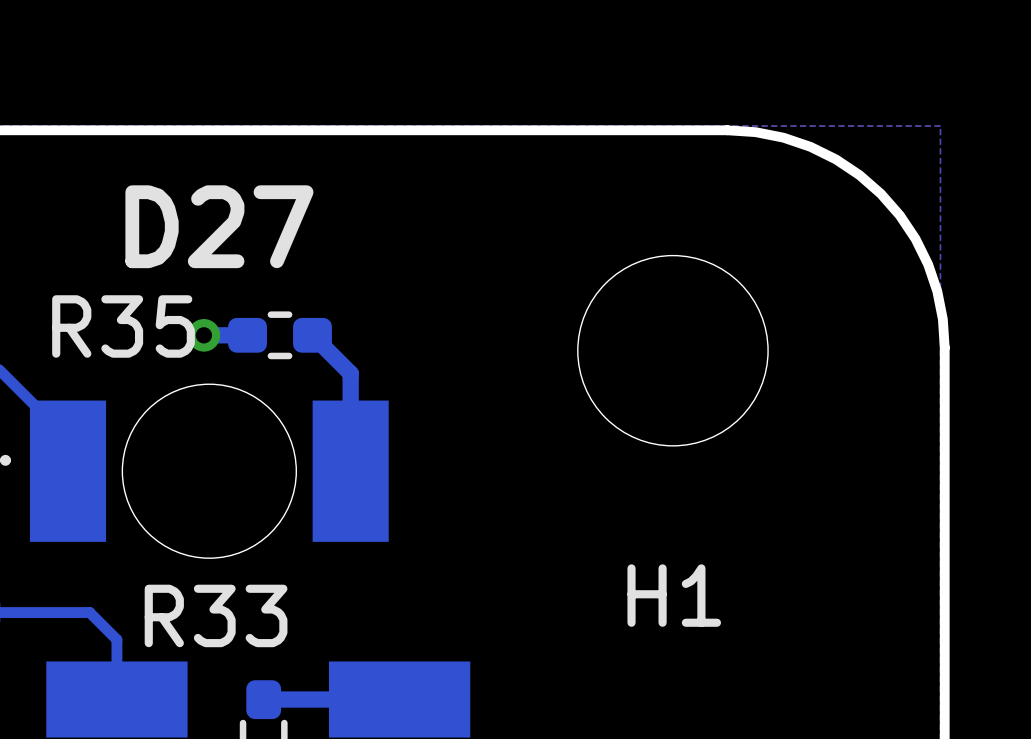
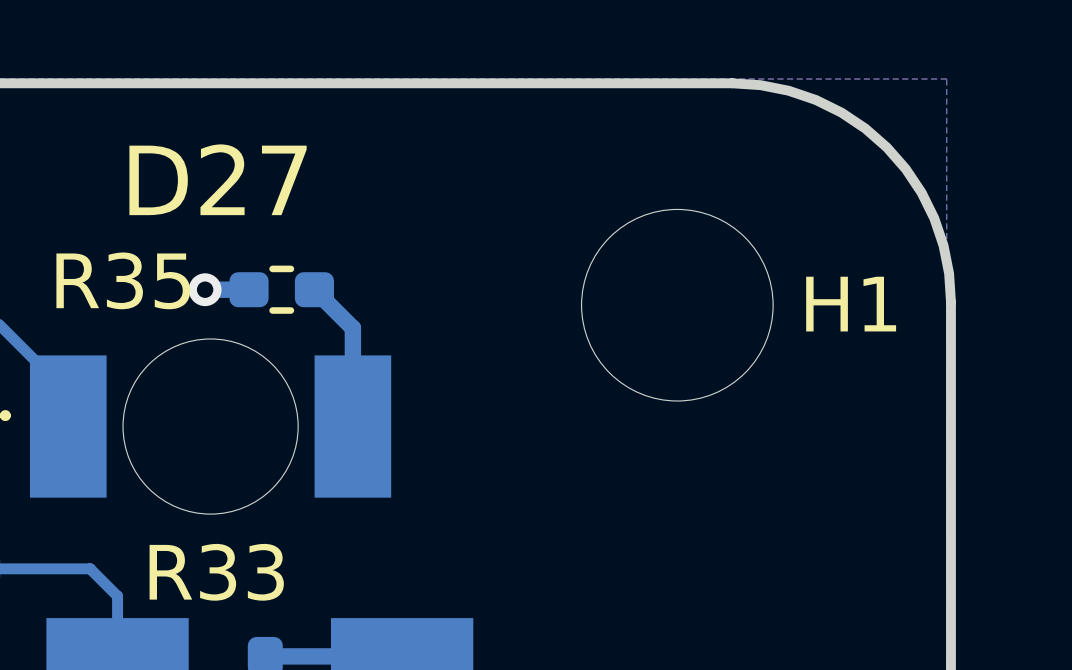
H1 name position: H1 (674, 595) -> H1 (851, 304)

